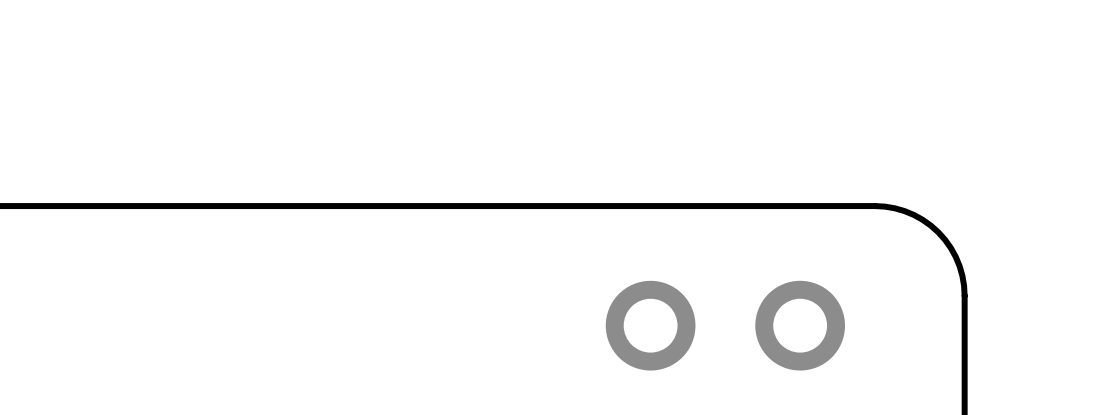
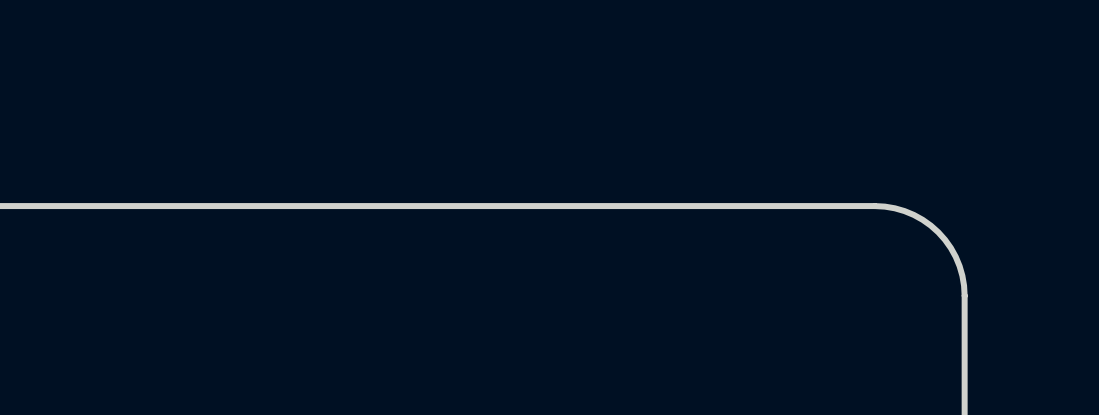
part: (725, 325) -> none

